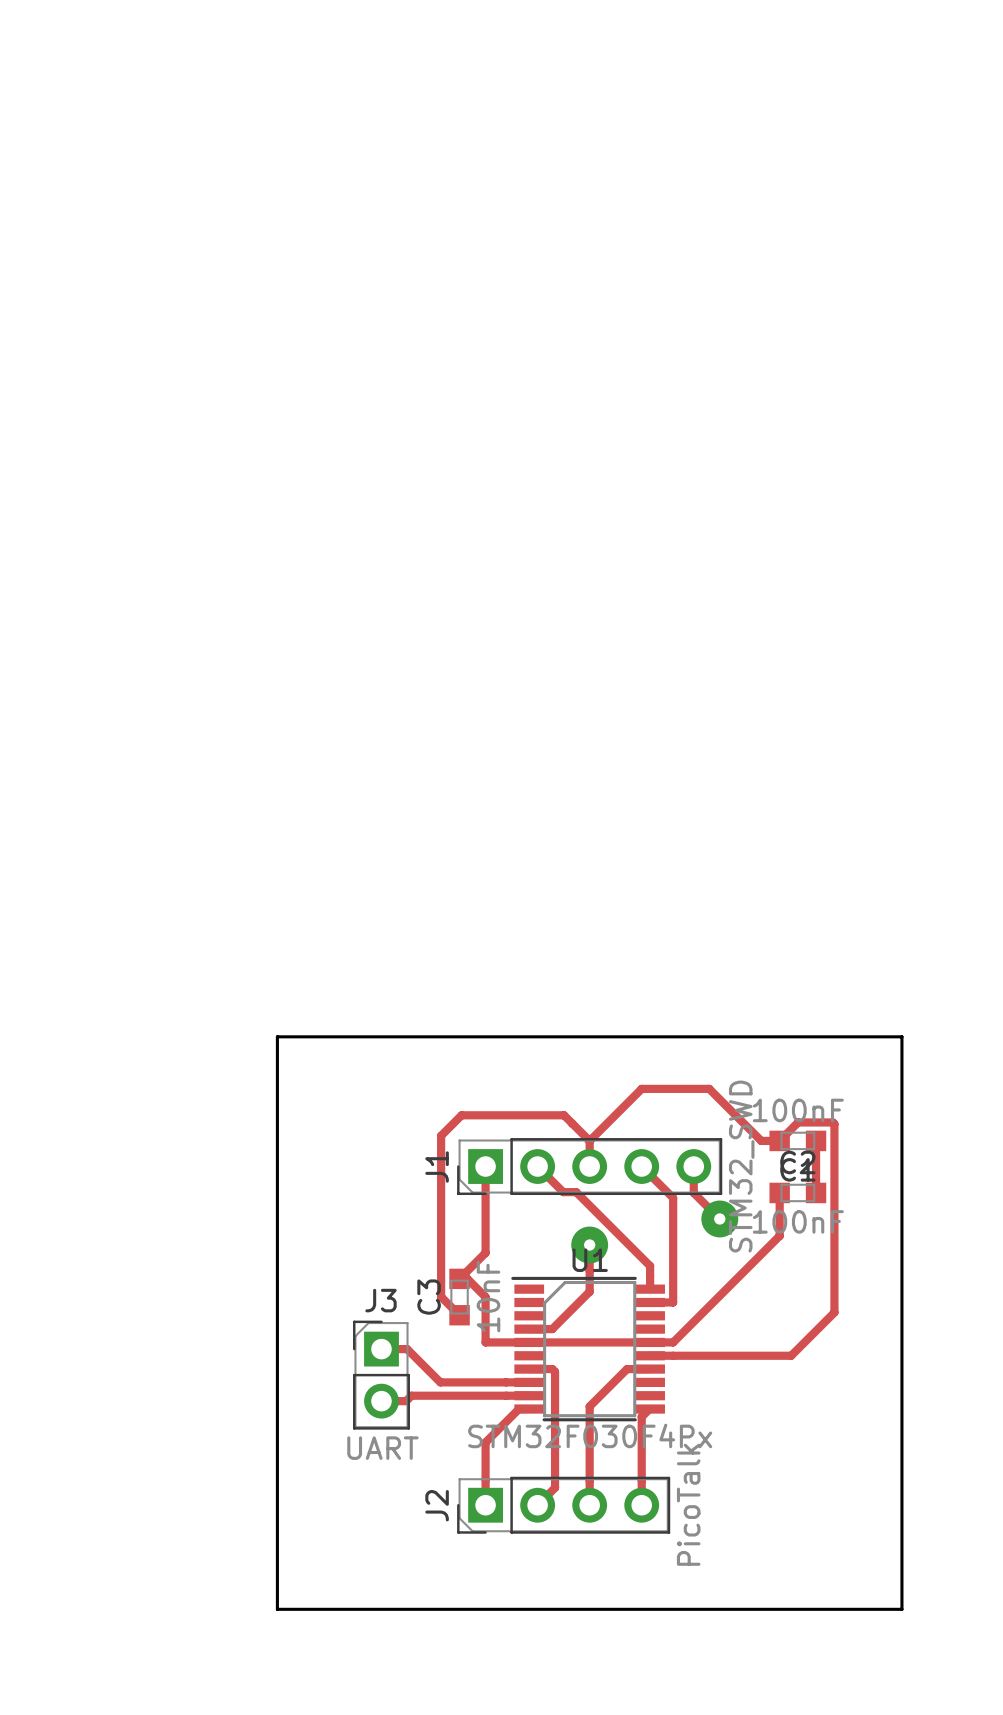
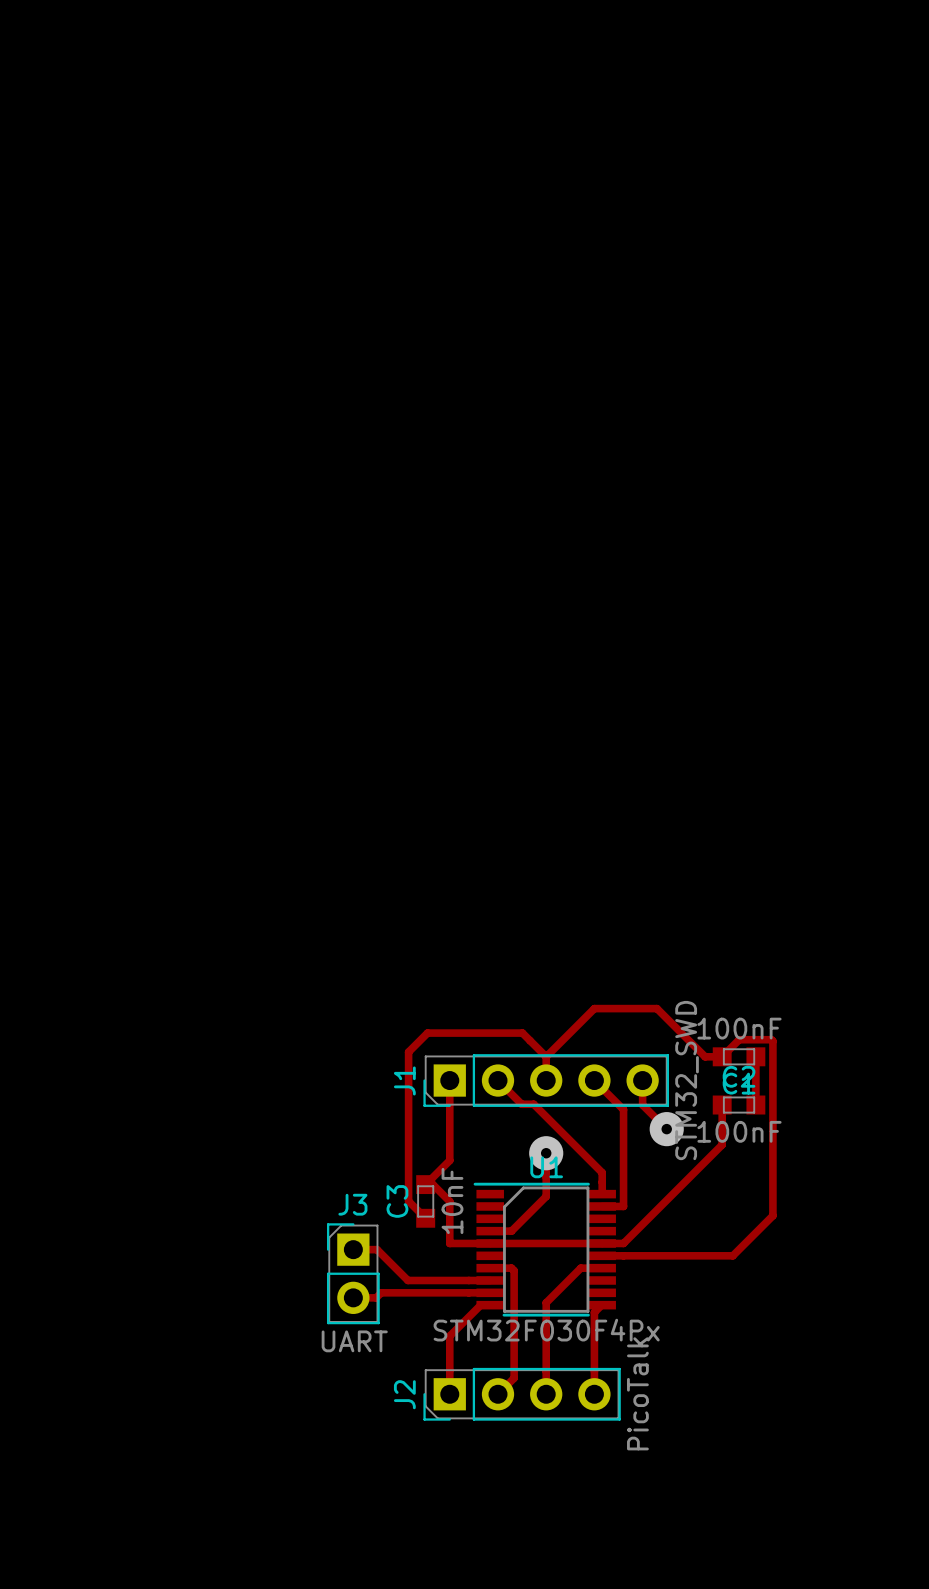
board edge: (277, 1036) (277, 1609) (901, 1609) (901, 1036) (277, 1036) -> none

